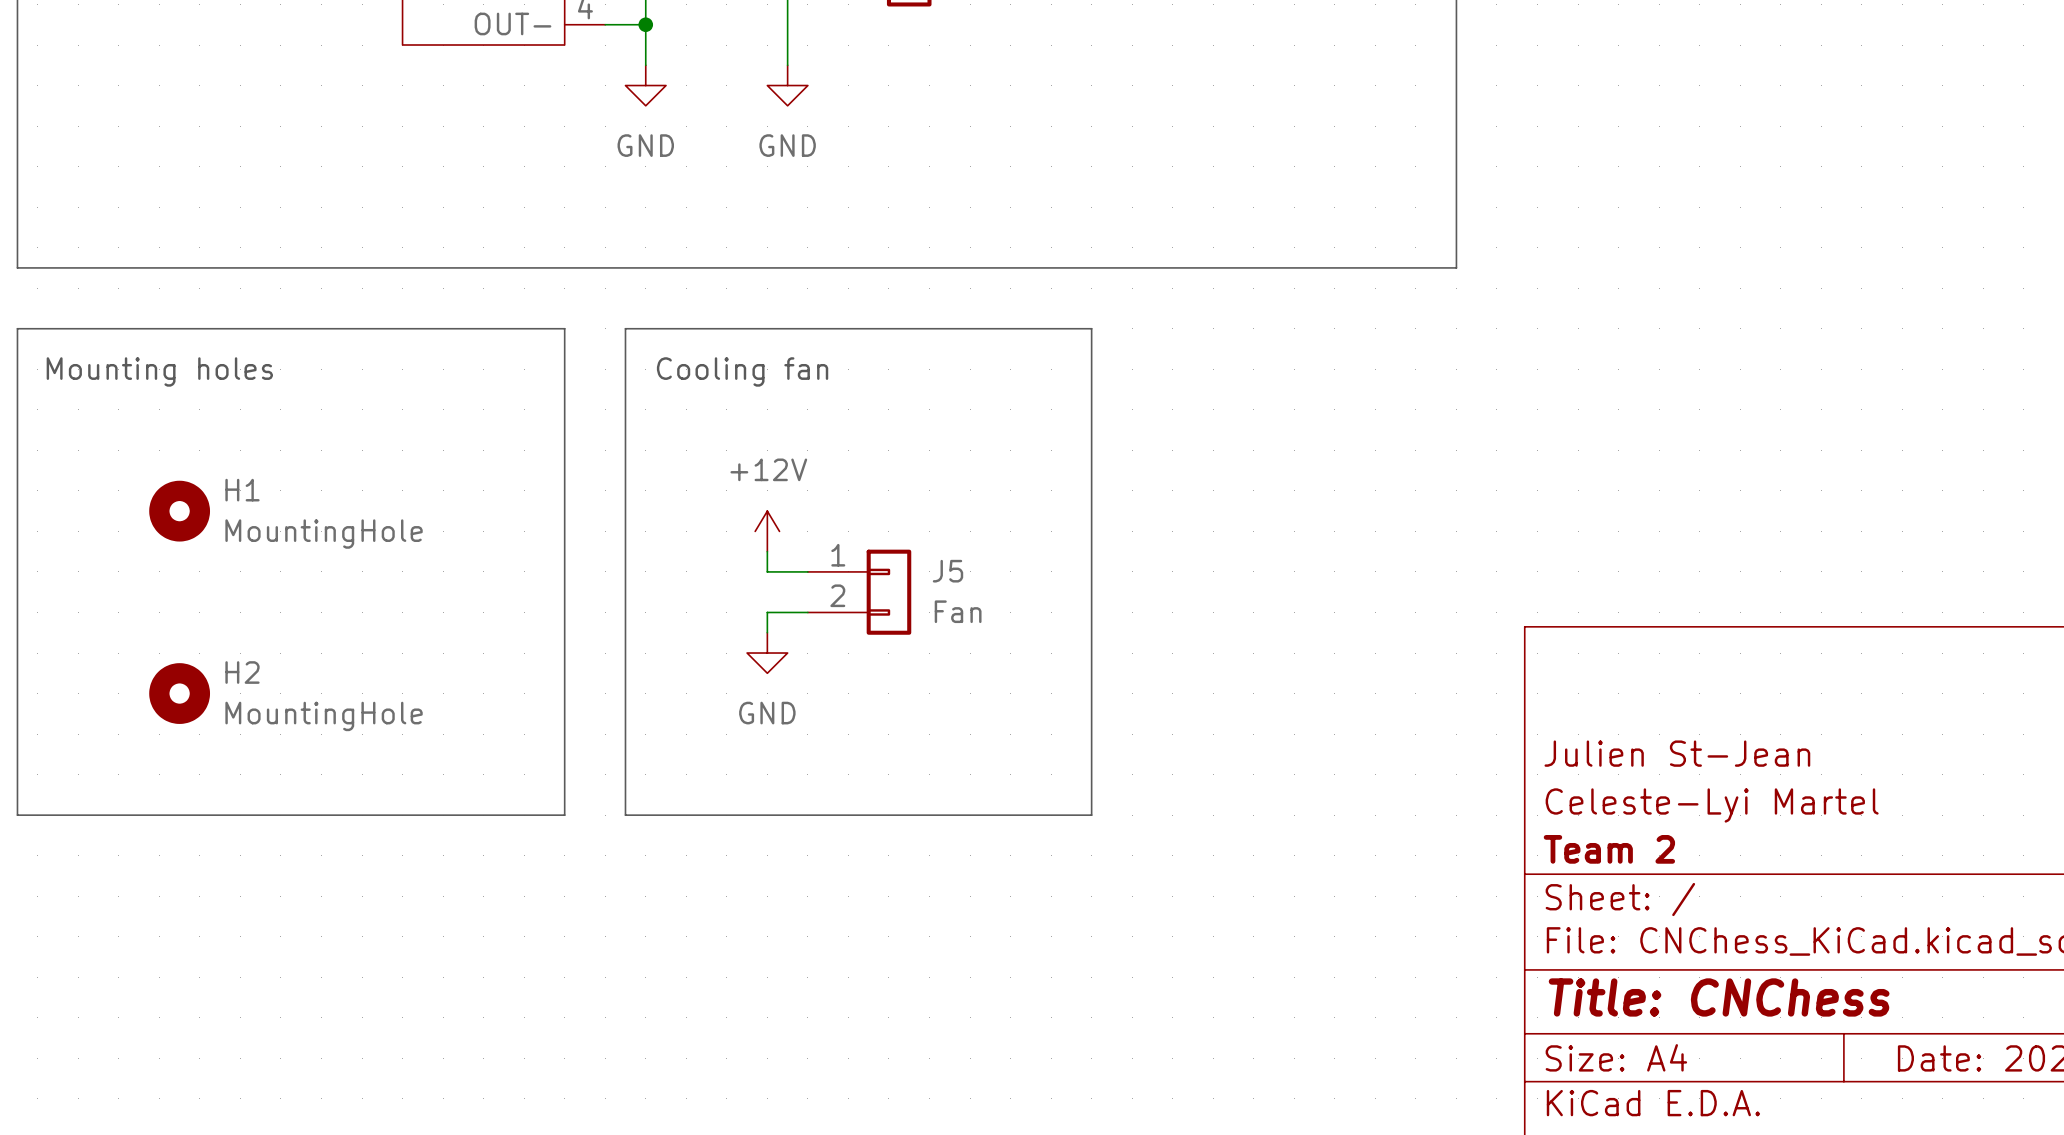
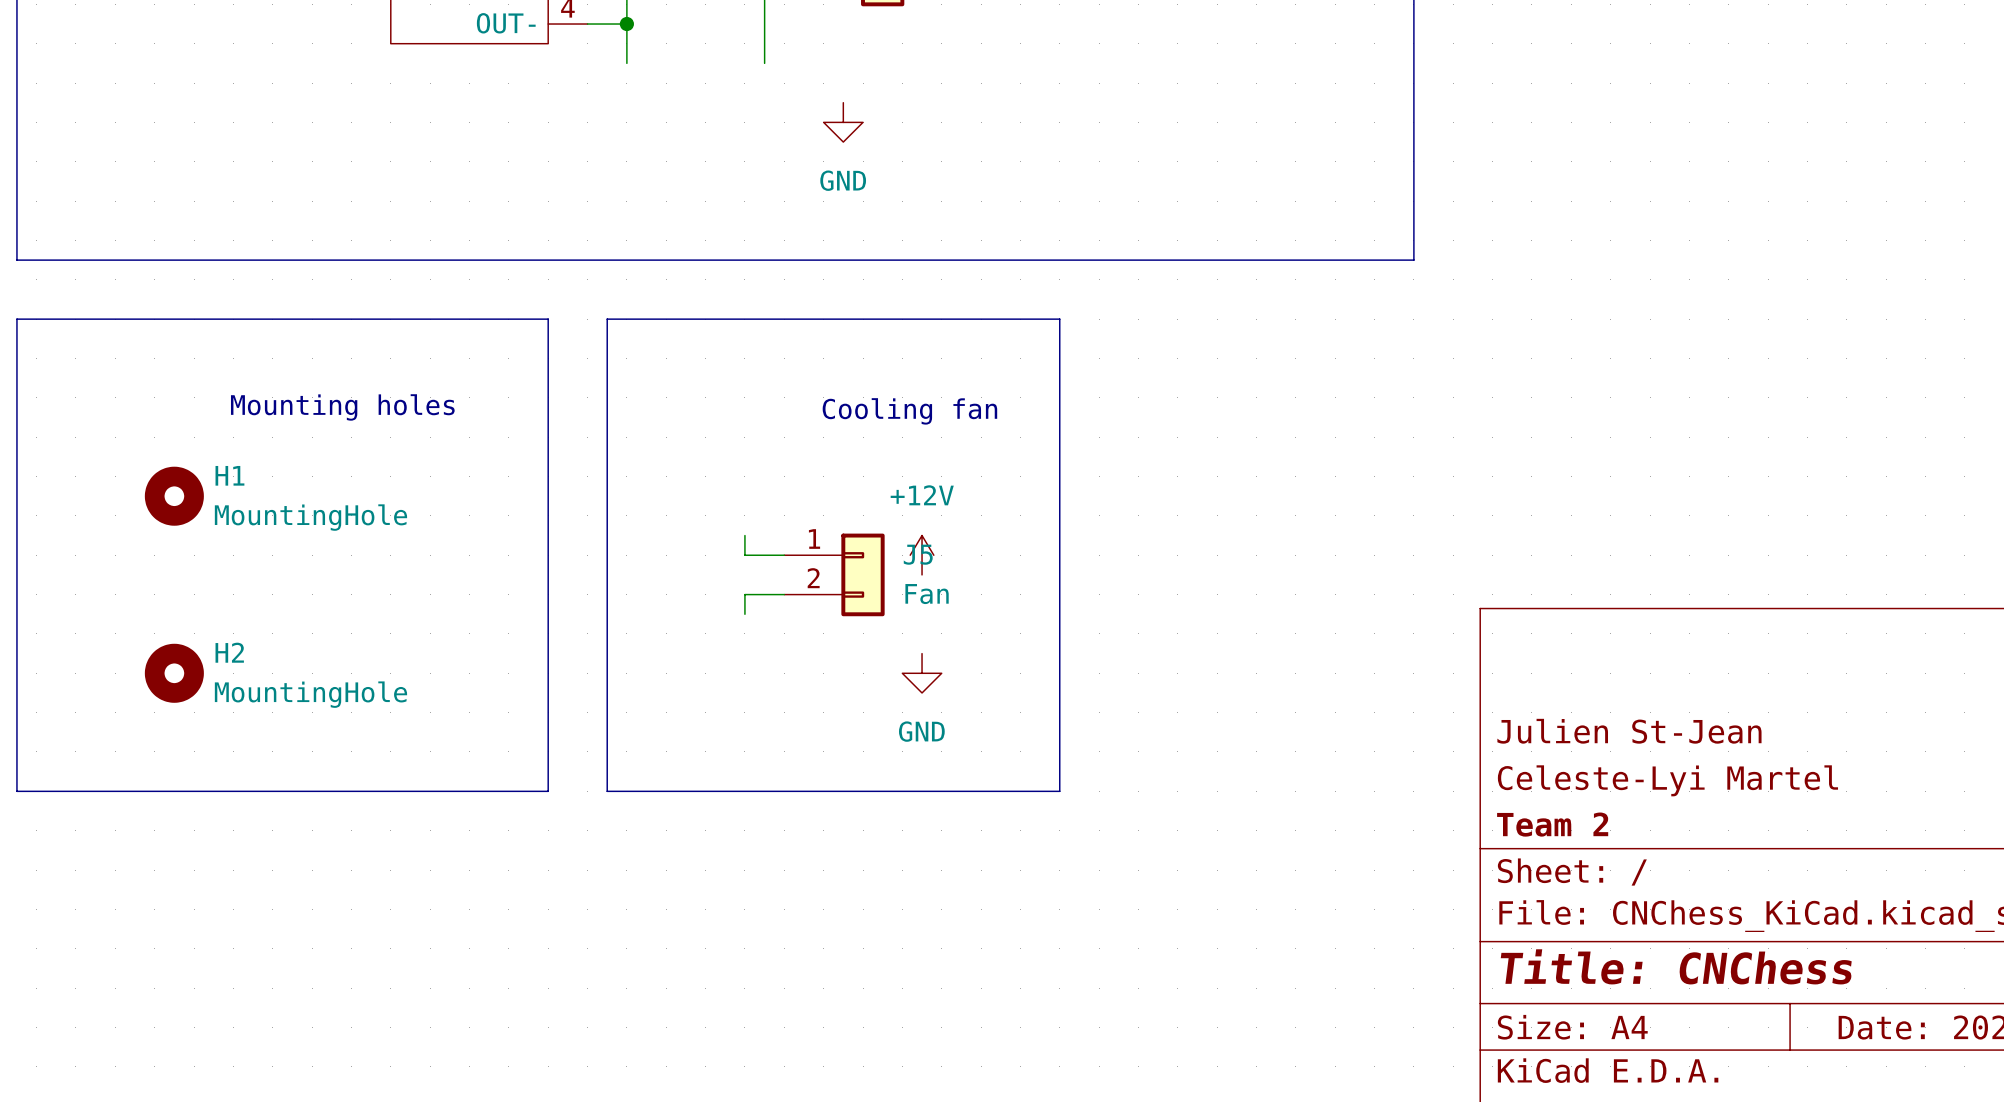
power symbol: GND (645, 85) -> none
power symbol position: GND (787, 85) -> GND (843, 122)
text position: Mounting holes (159, 371) -> Mounting holes (342, 407)
text position: Cooling fan (742, 371) -> Cooling fan (909, 411)
power symbol position: +12V (767, 531) -> +12V (922, 555)
power symbol position: GND (767, 653) -> GND (922, 673)

